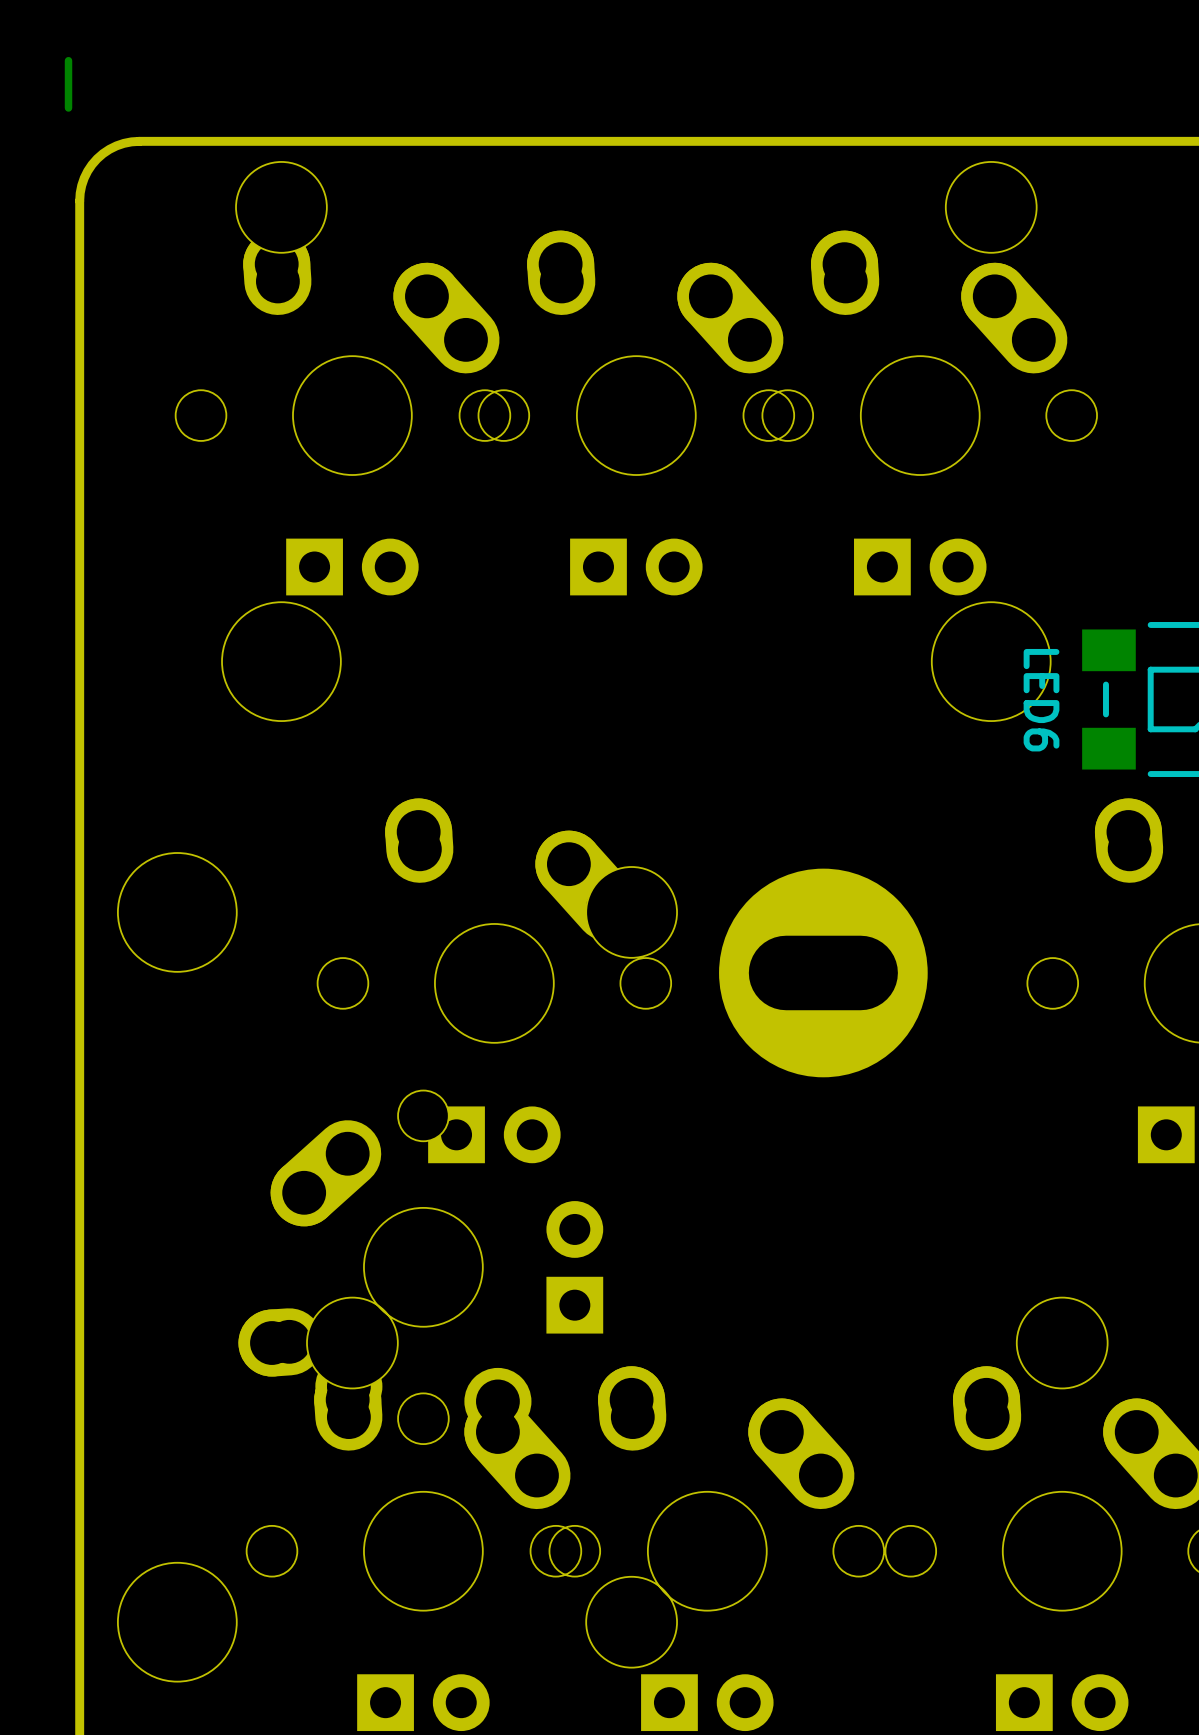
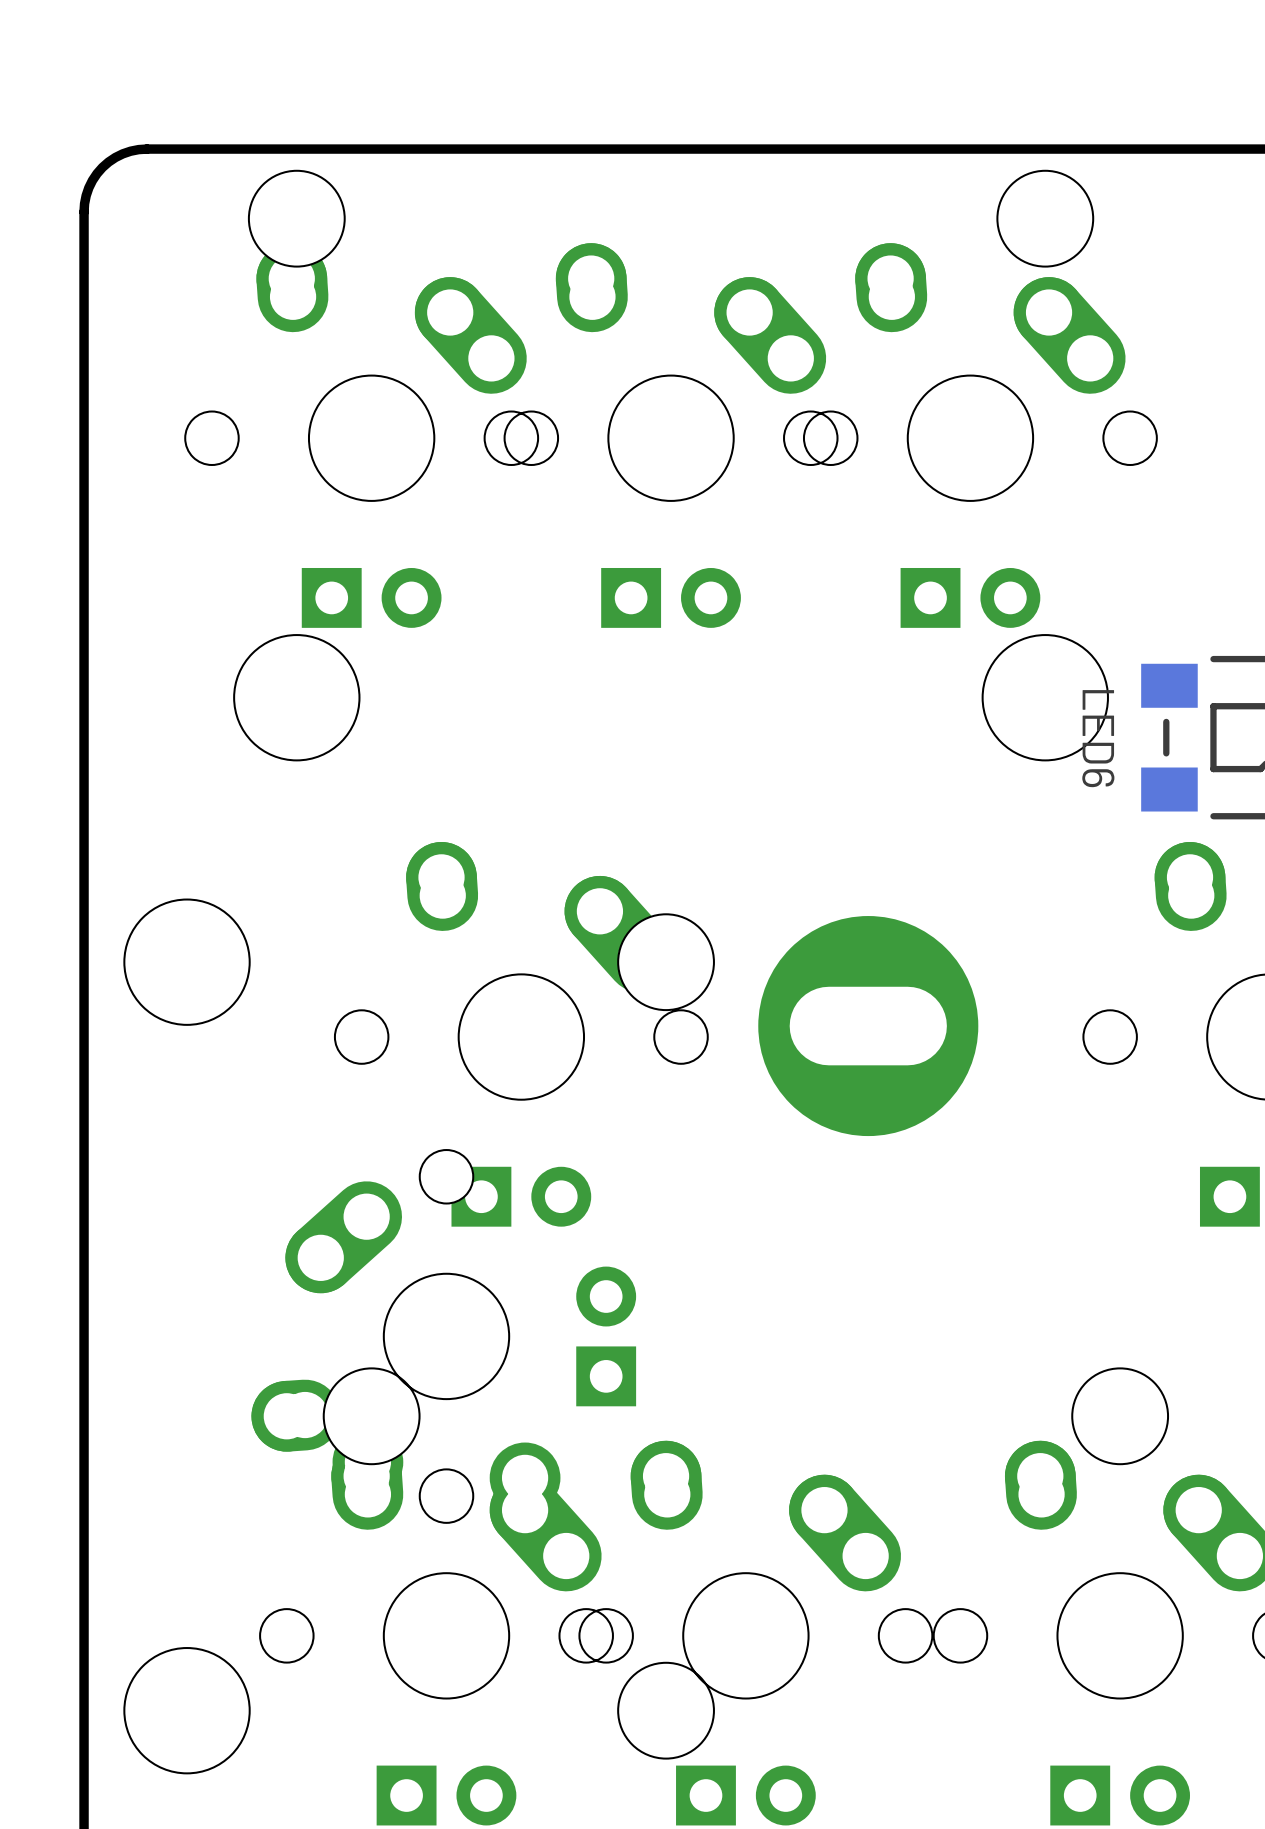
bottom track: (68, 60) (68, 108) -> none

